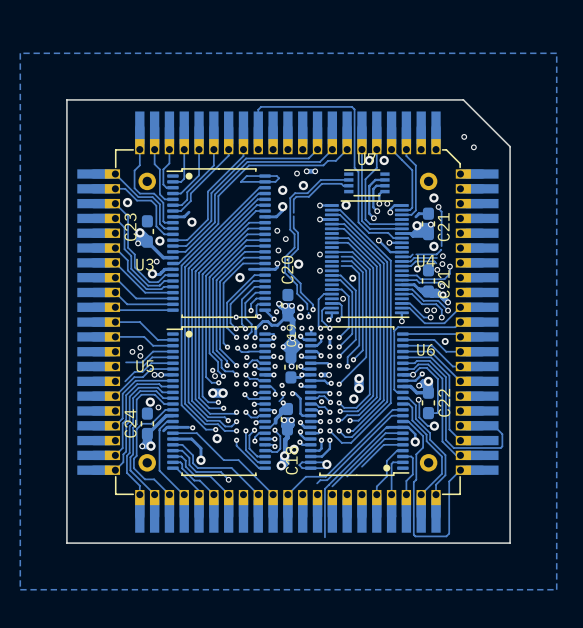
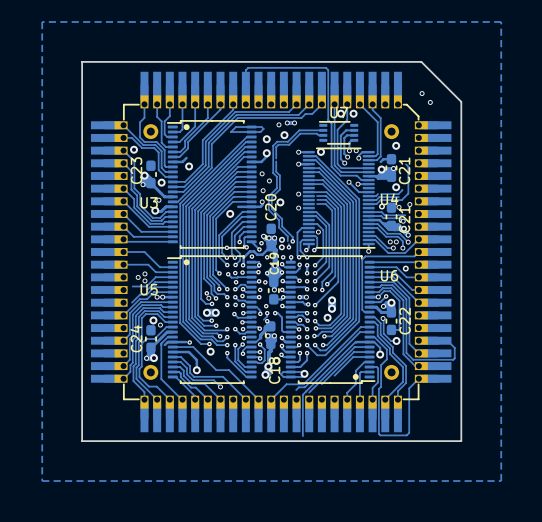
via: (438, 207) -> none
track: (438, 208) (441, 211) (441, 246) -> none
via: (442, 256) -> none
track: (434, 261) (436, 263) -> (396, 200) (401, 200) (408, 193) (408, 166) (406, 164)
via: (442, 264) -> none
track: (449, 266) (449, 273) (444, 279) -> none
via: (352, 278) -> none

